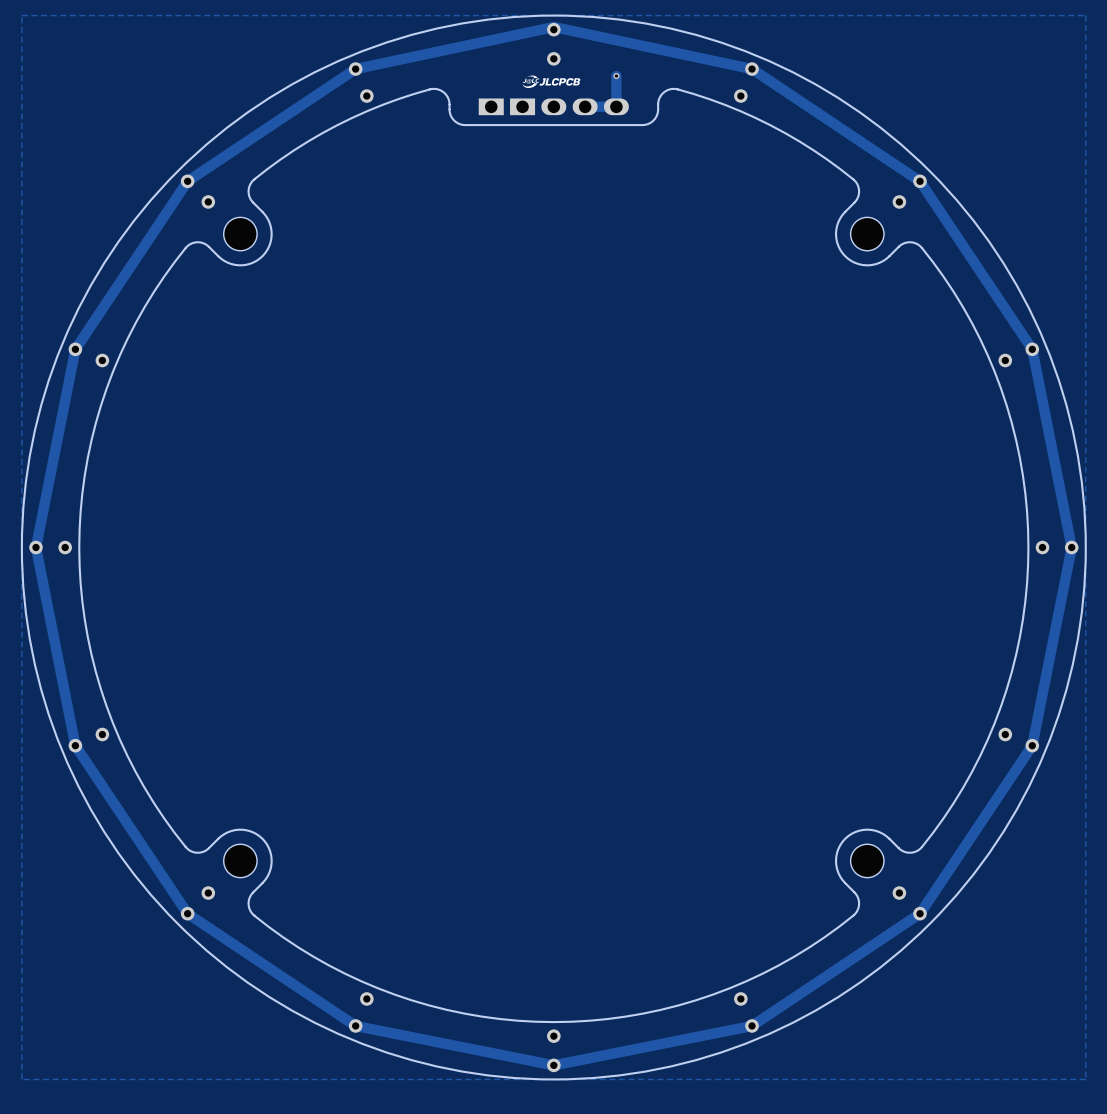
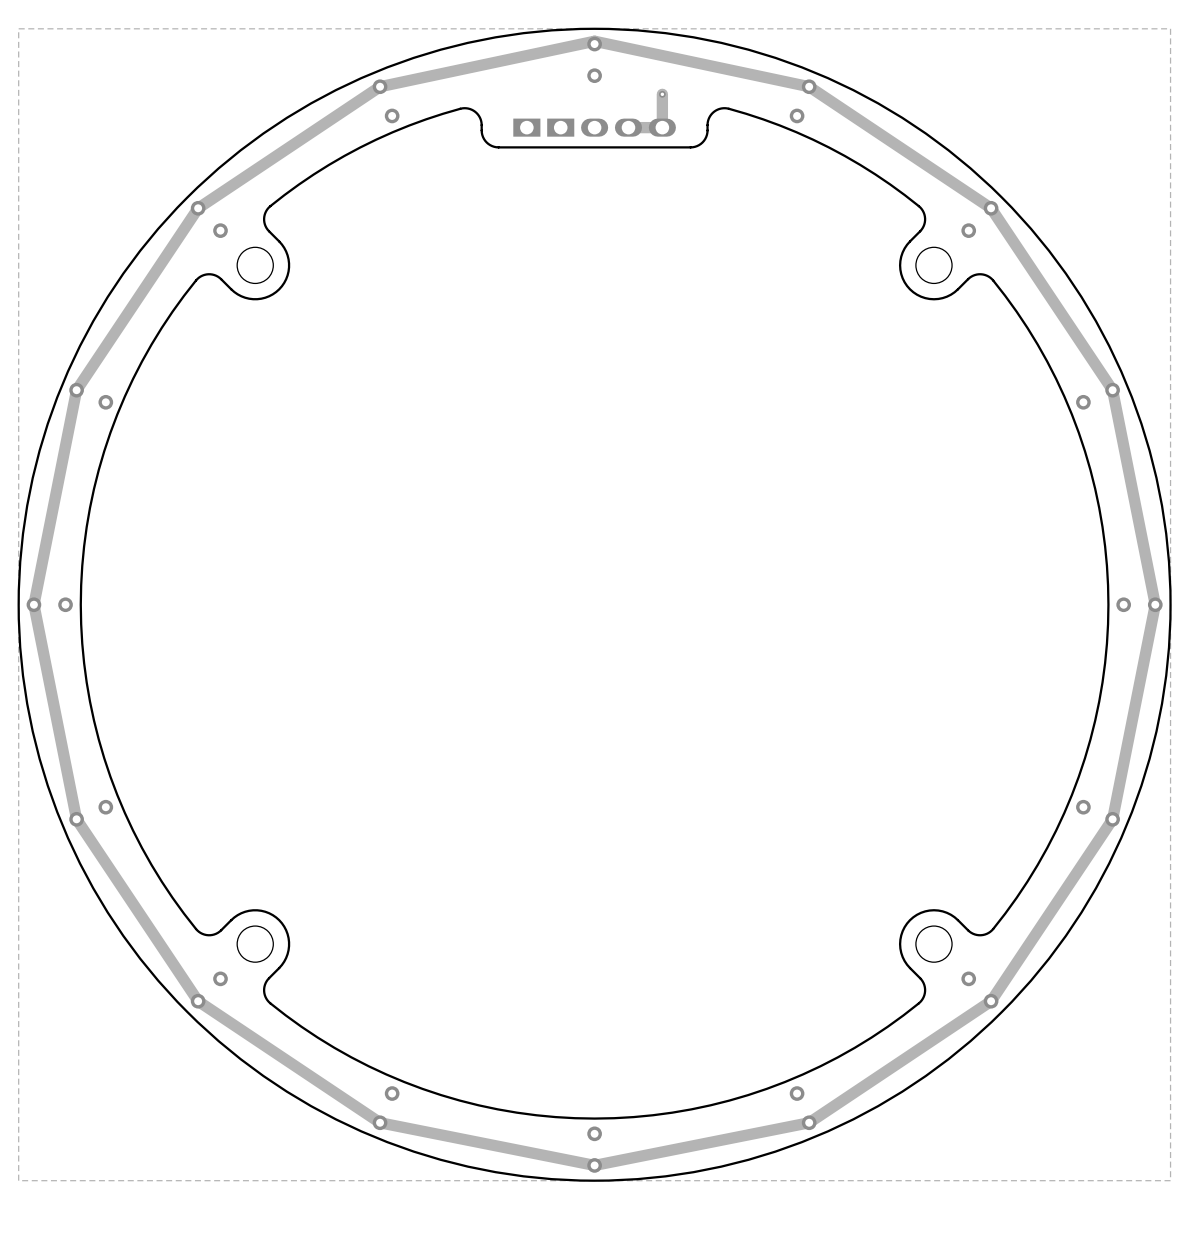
drawing: [522, 75, 581, 88] -> none

